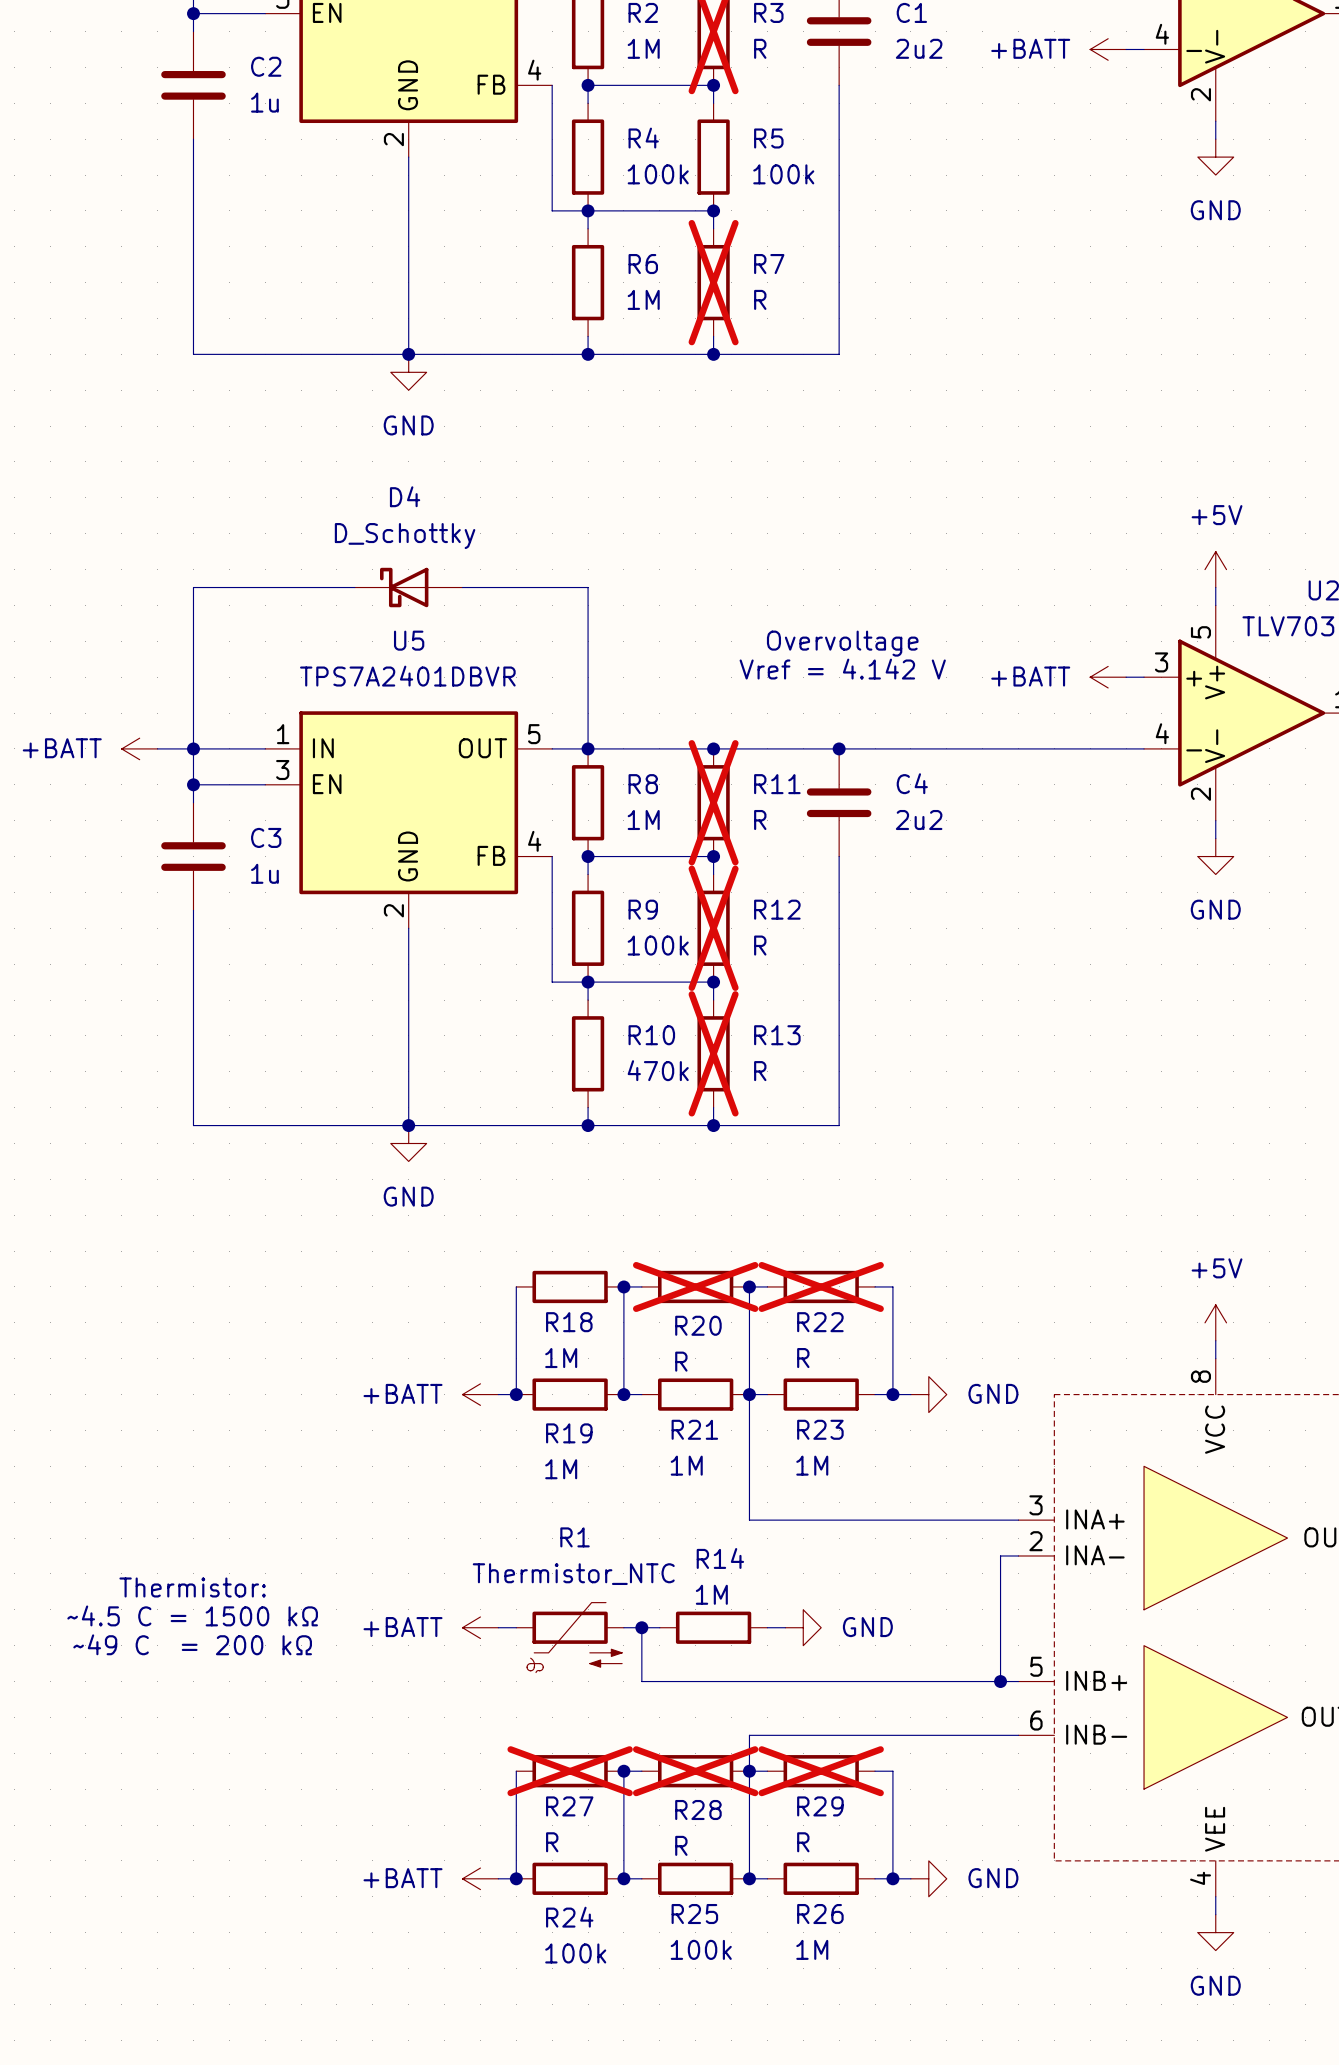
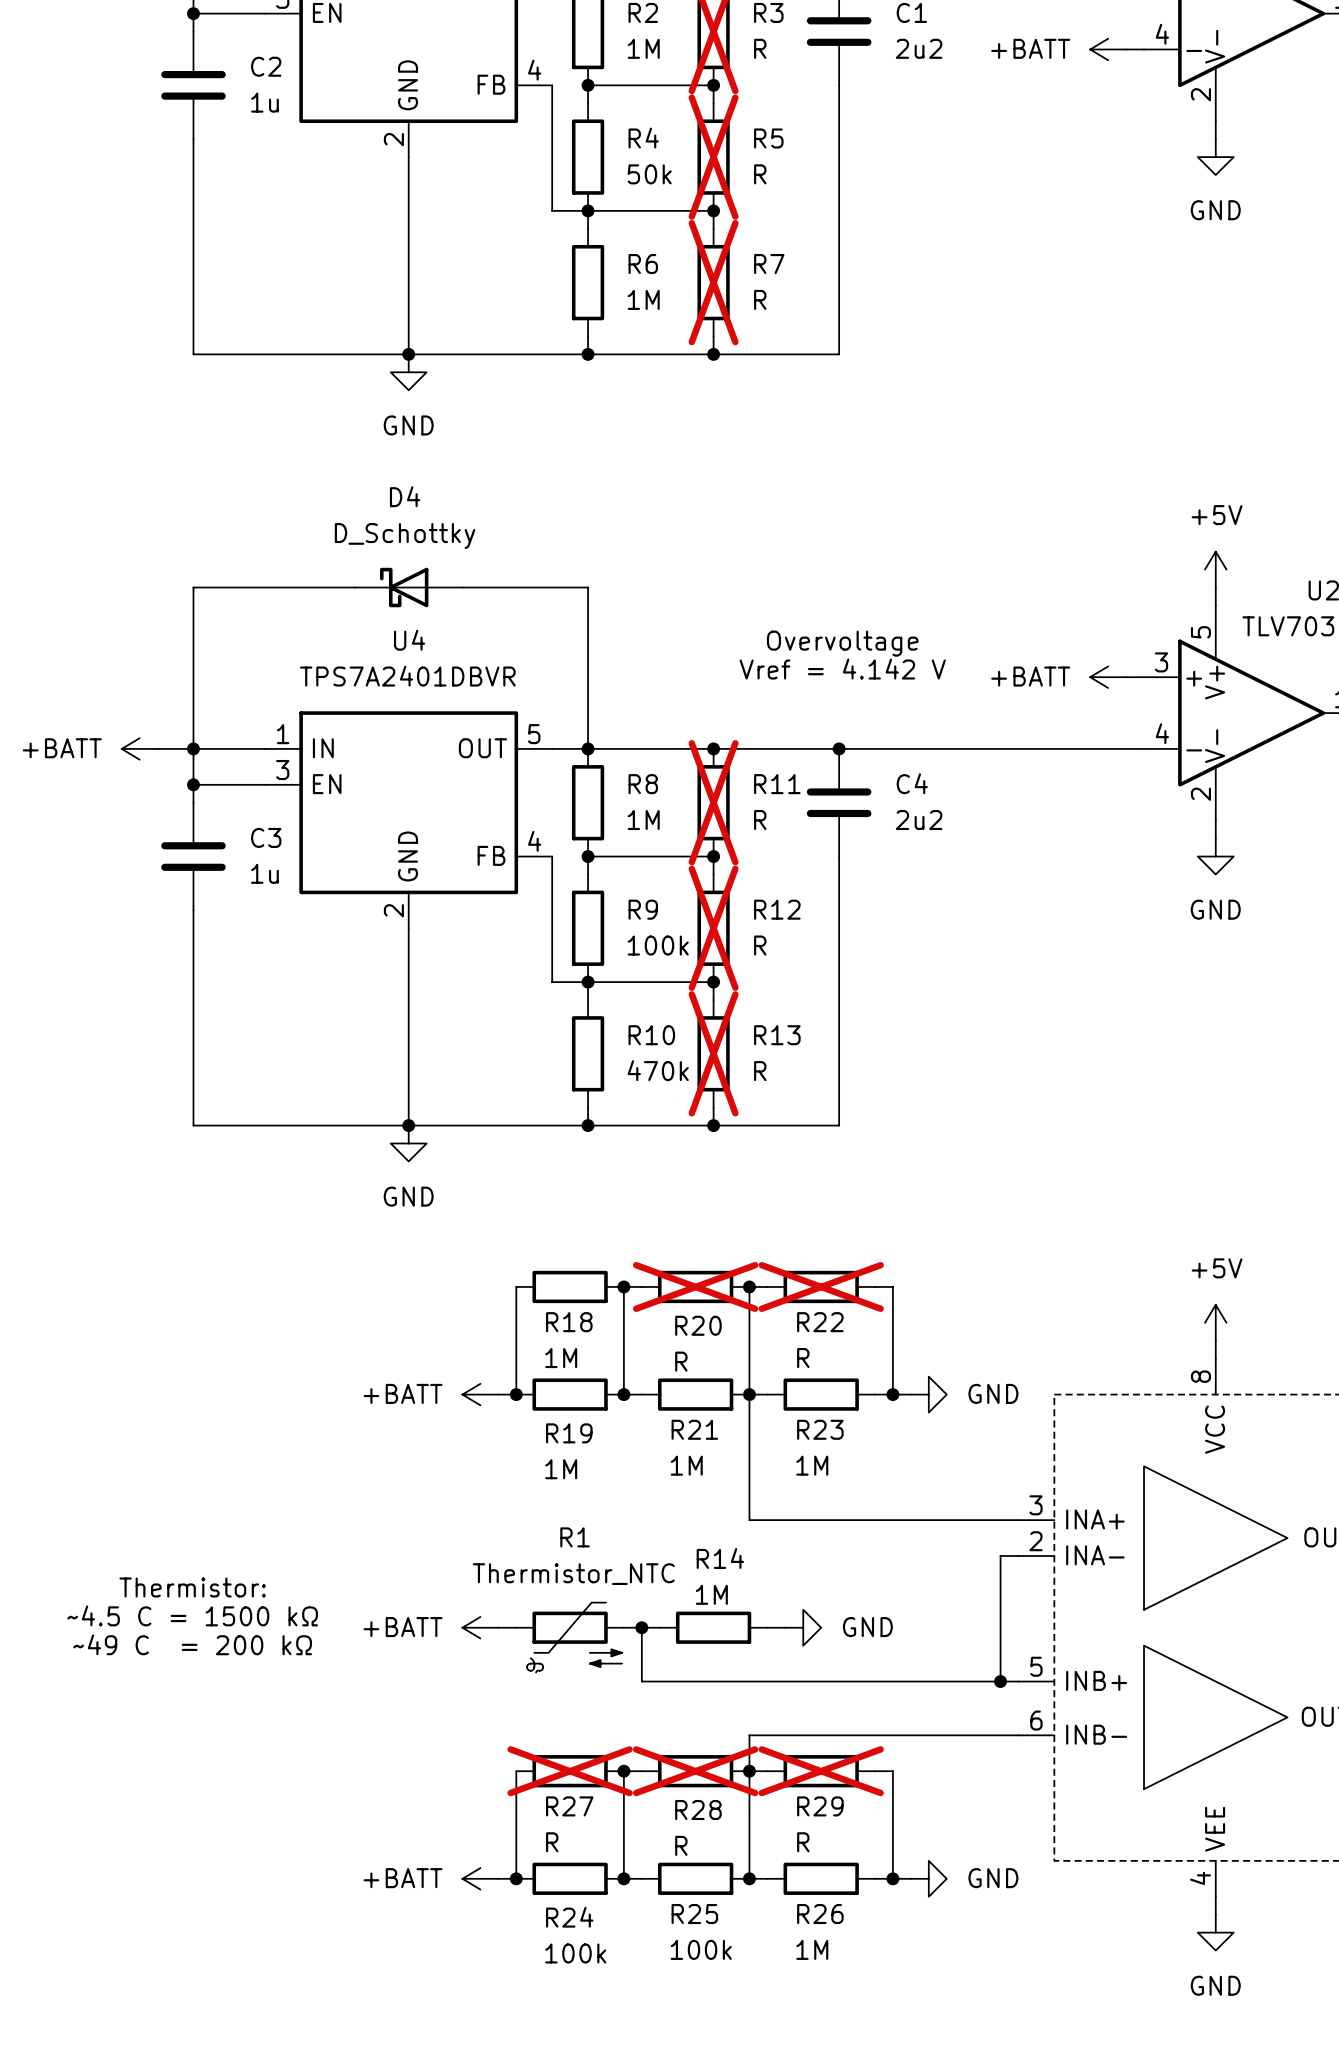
R5 do-not-place cross: none -> (713, 157)
R4 value: 100k (658, 174) -> 50k (649, 174)
R5 value: 100k (783, 174) -> R (760, 174)
U5 name: U5 (409, 640) -> U4 (409, 640)

